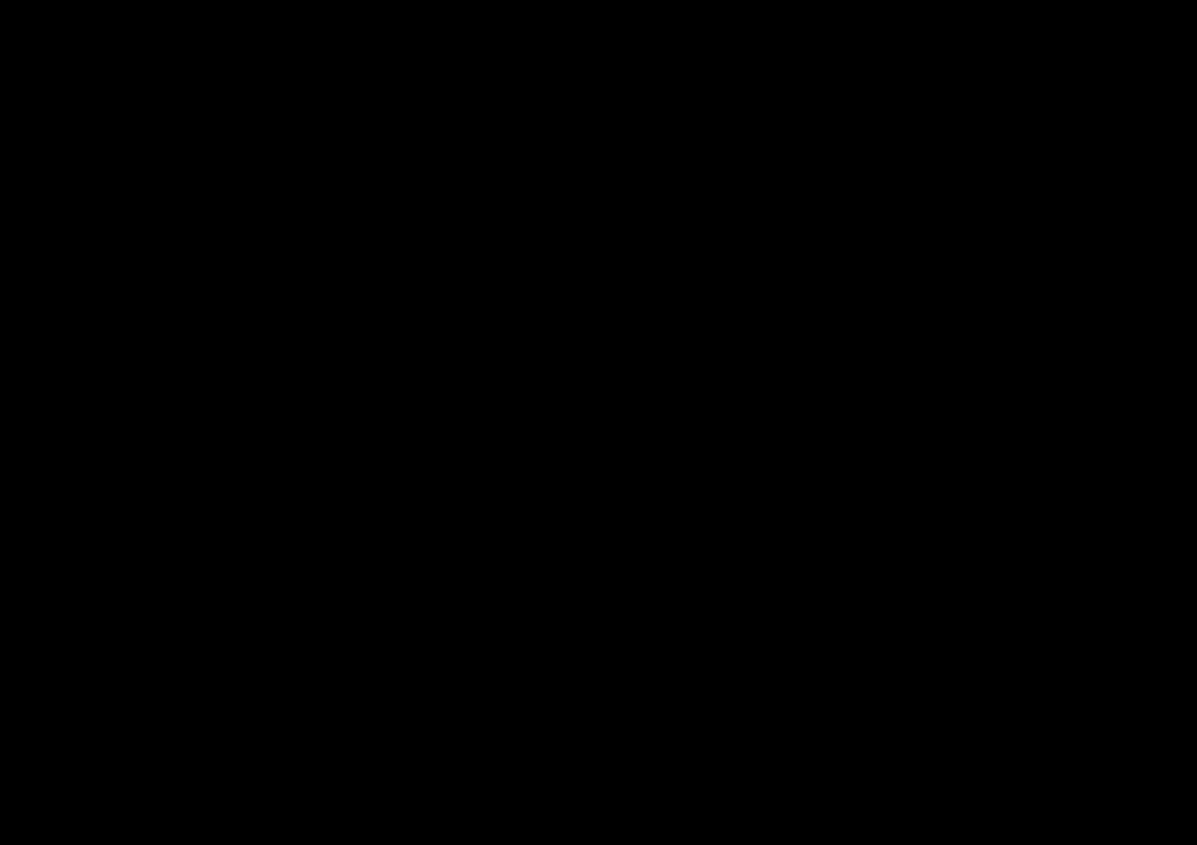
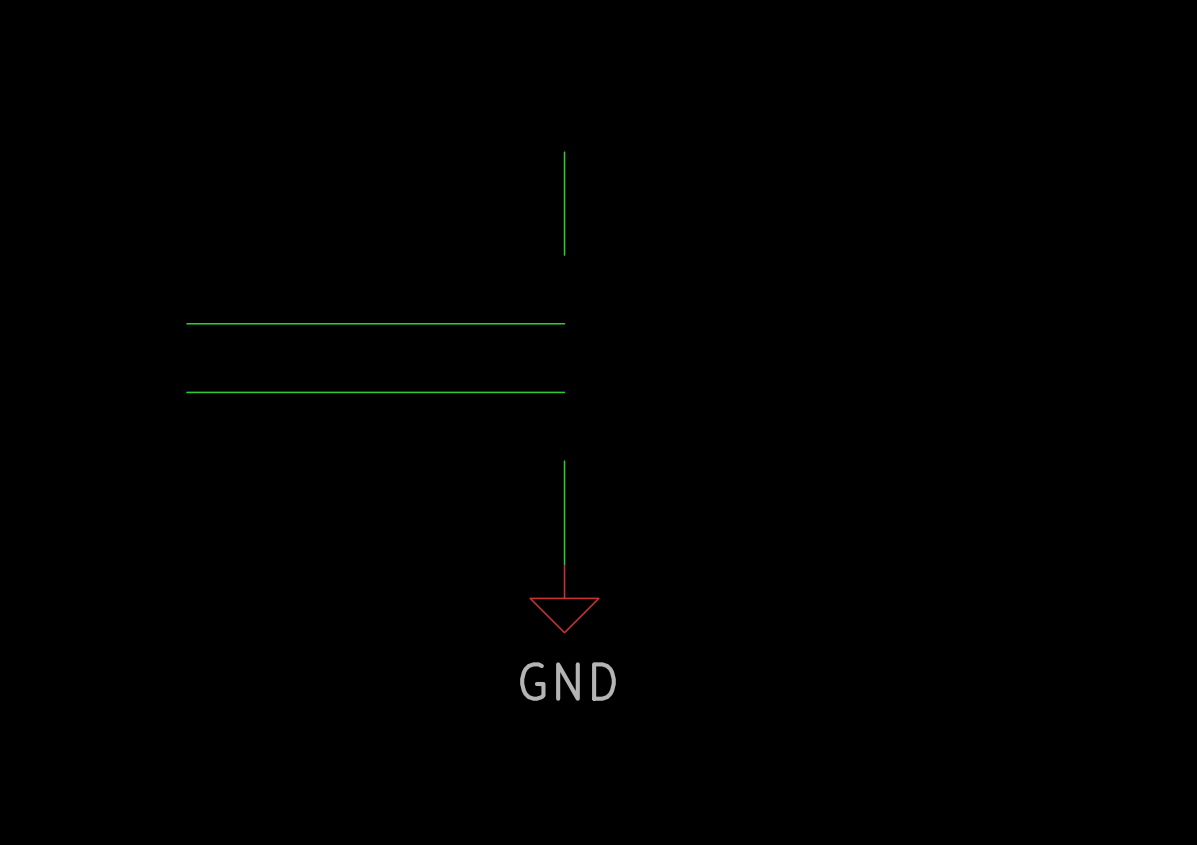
wire: none -> (564, 152) (564, 255)
wire: none -> (186, 323) (564, 323)
wire: none -> (186, 392) (564, 392)
wire: none -> (564, 461) (564, 564)
power symbol: none -> GND (564, 598)

